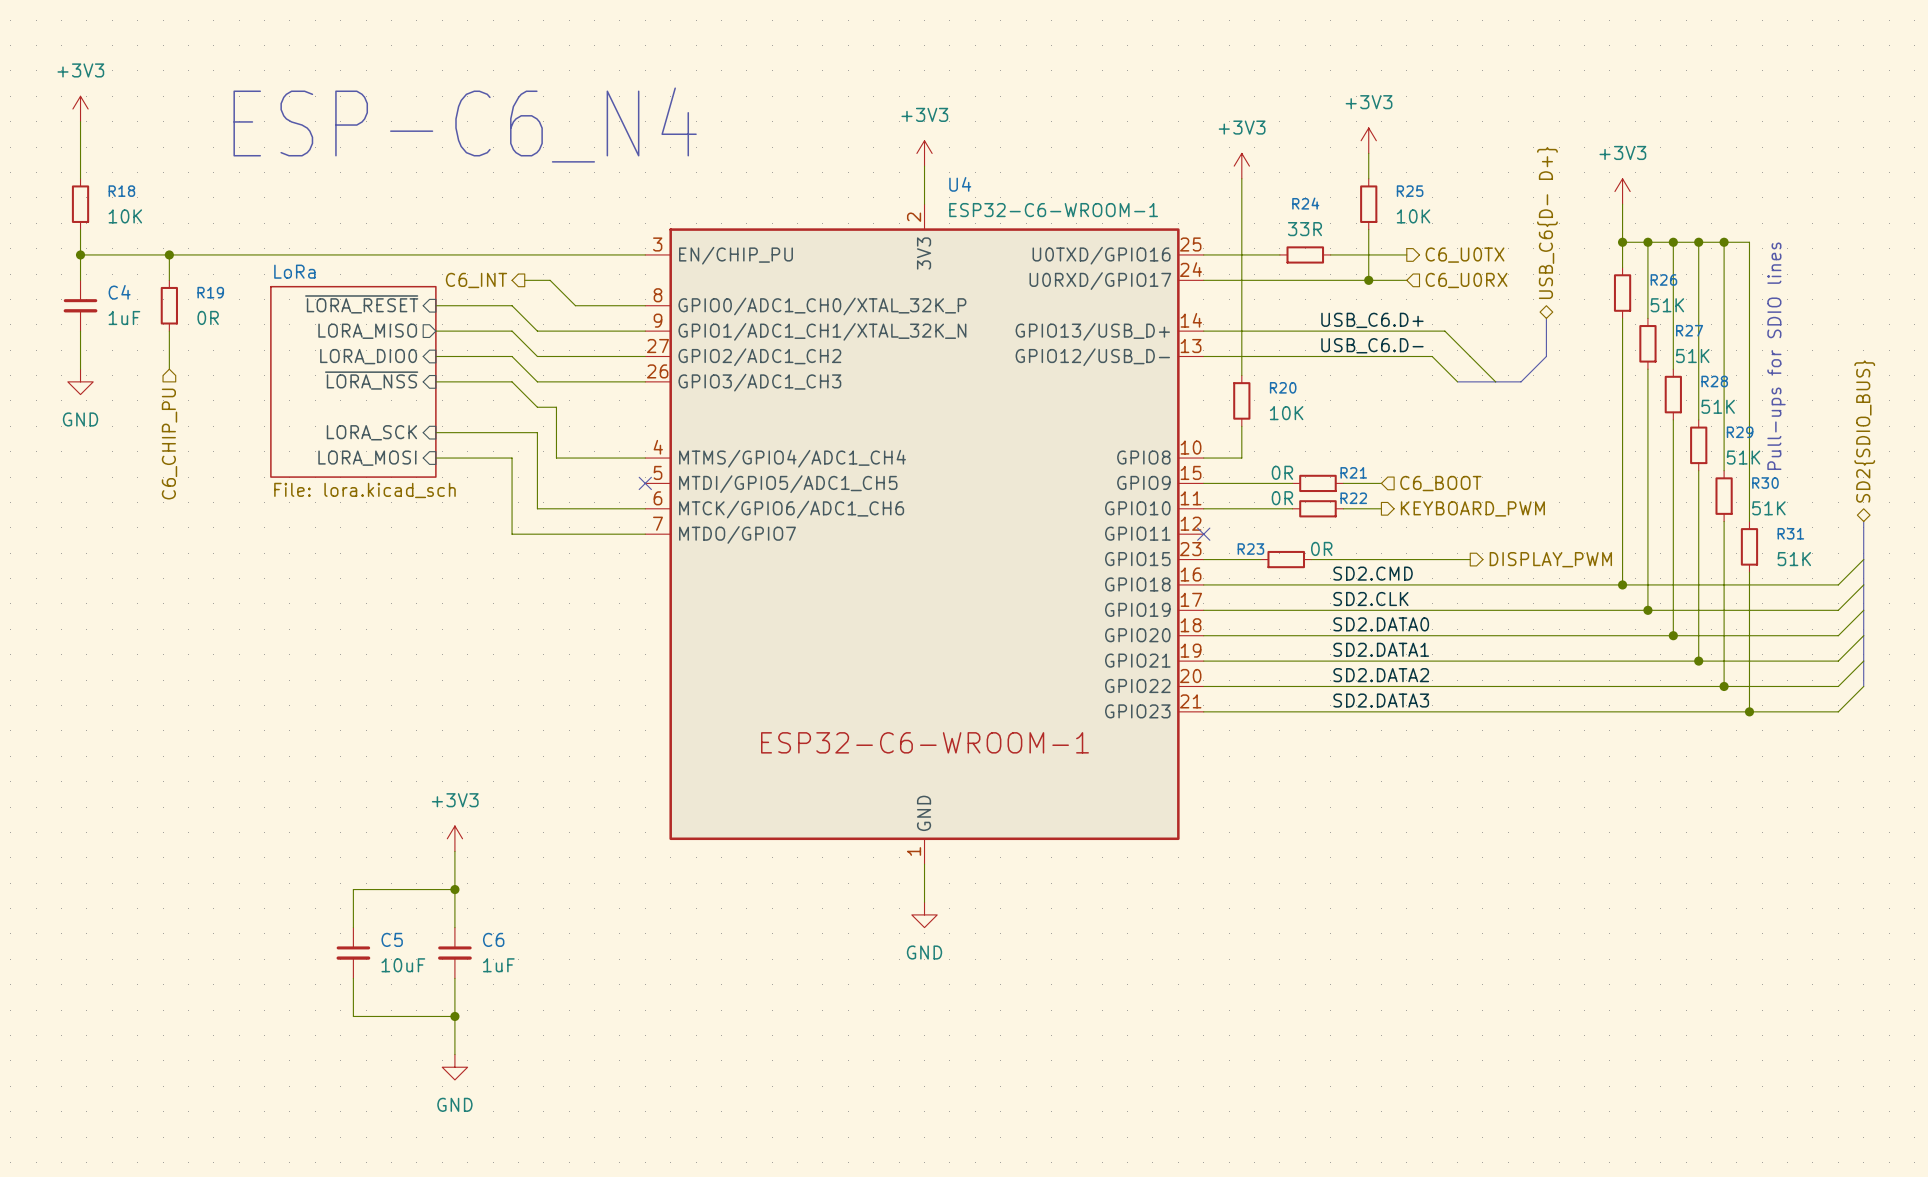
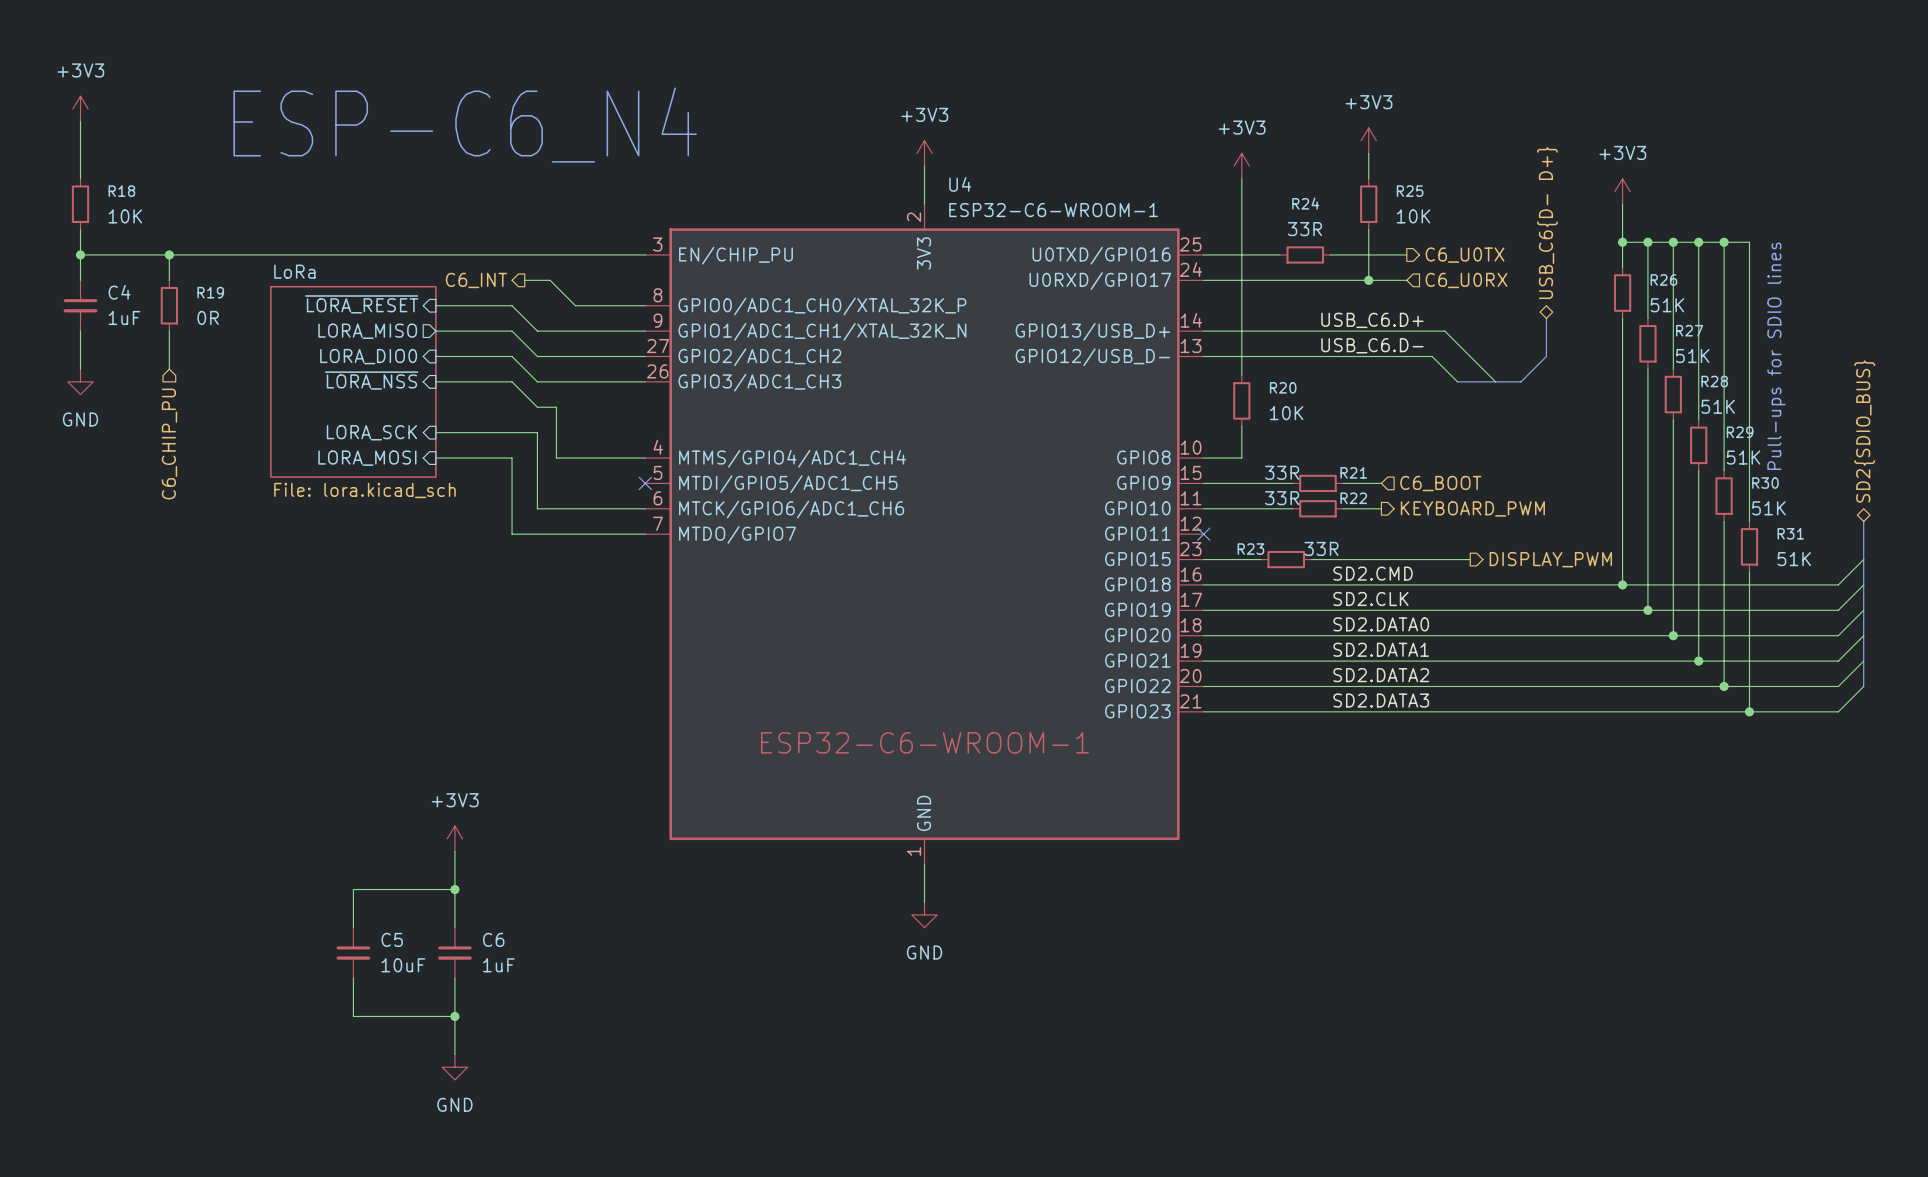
R21 value: 0R (1282, 472) -> 33R (1282, 472)
R22 value: 0R (1282, 498) -> 33R (1282, 498)
R23 value: 0R (1321, 548) -> 33R (1321, 548)

